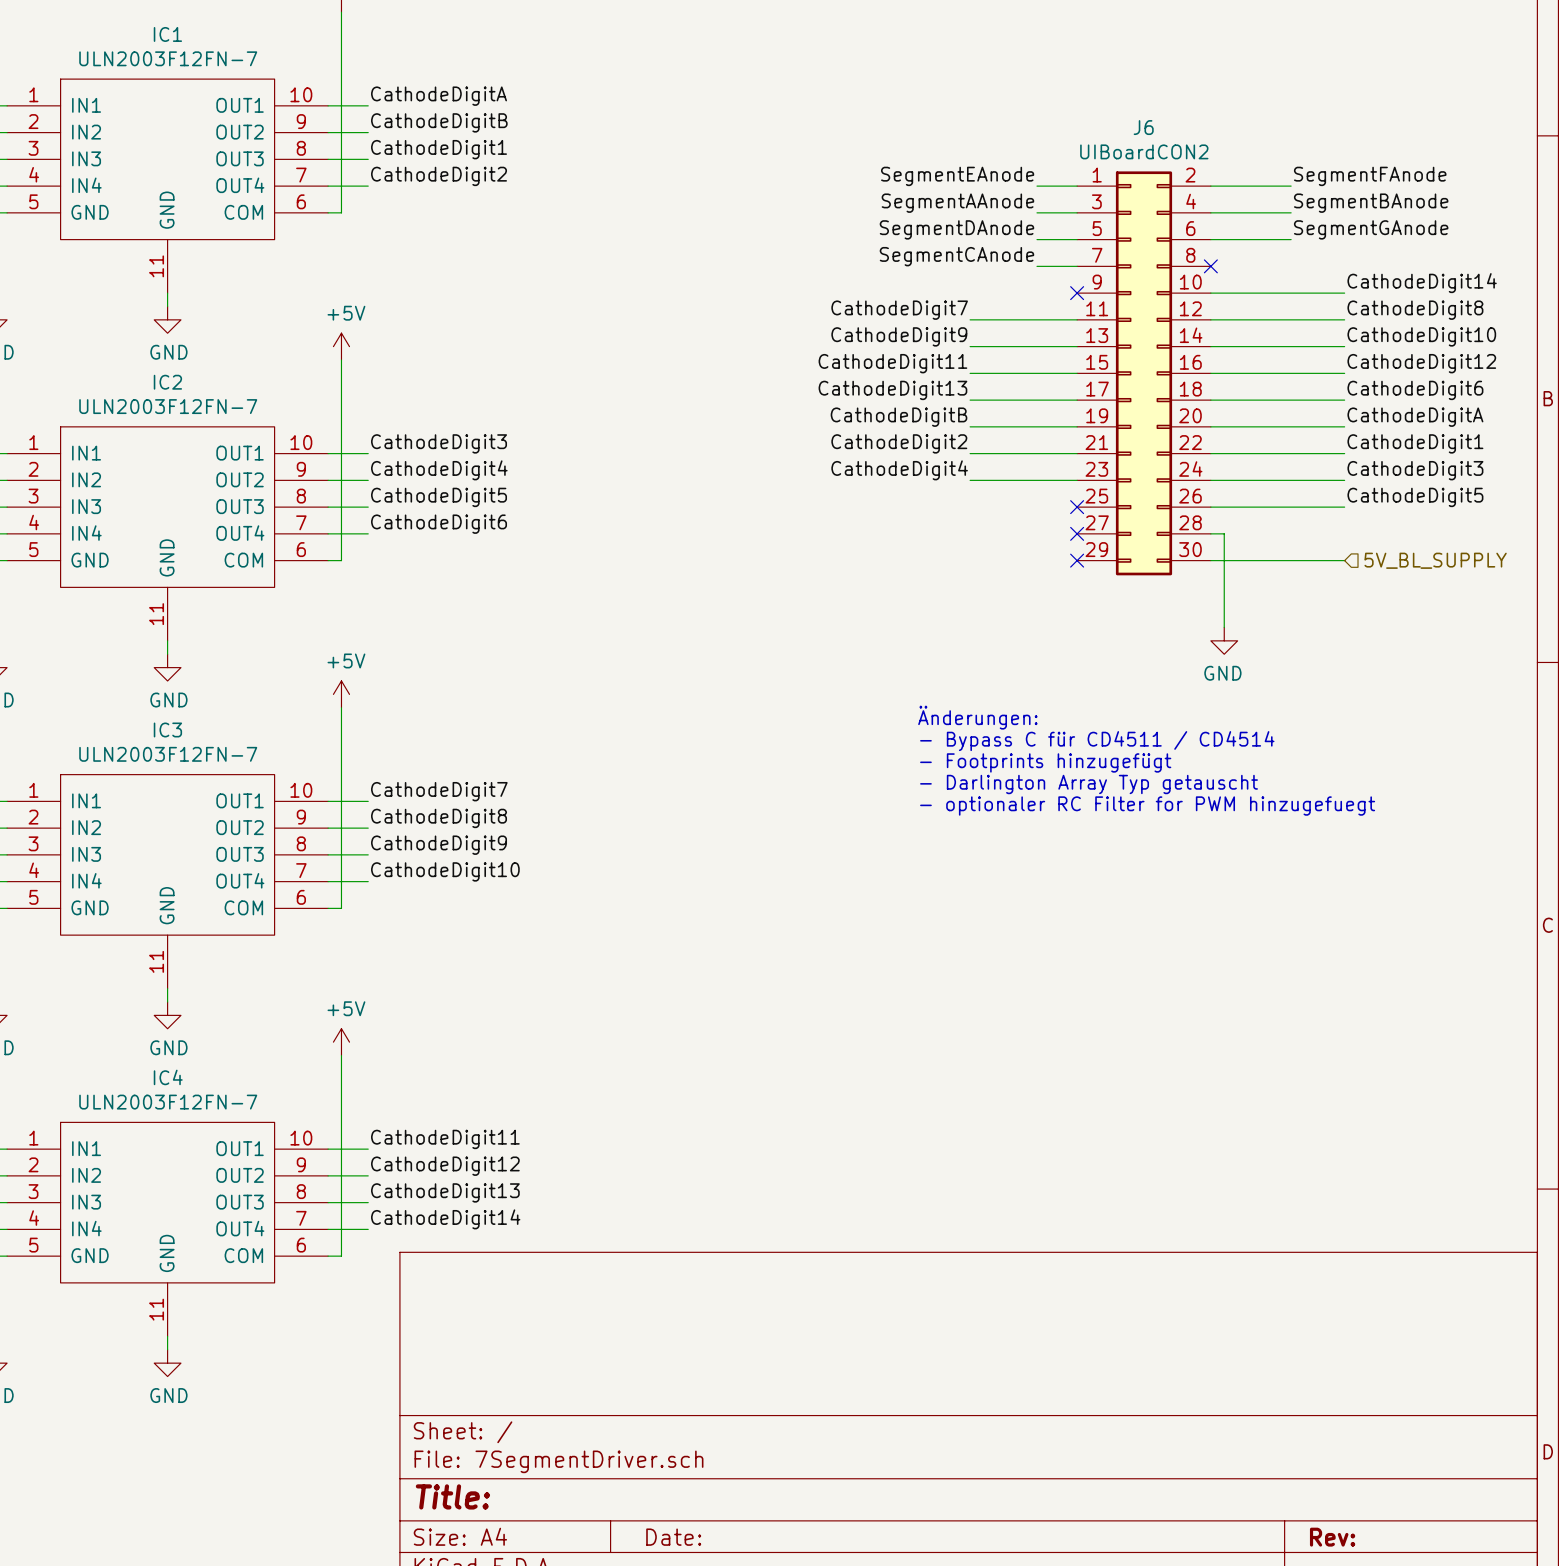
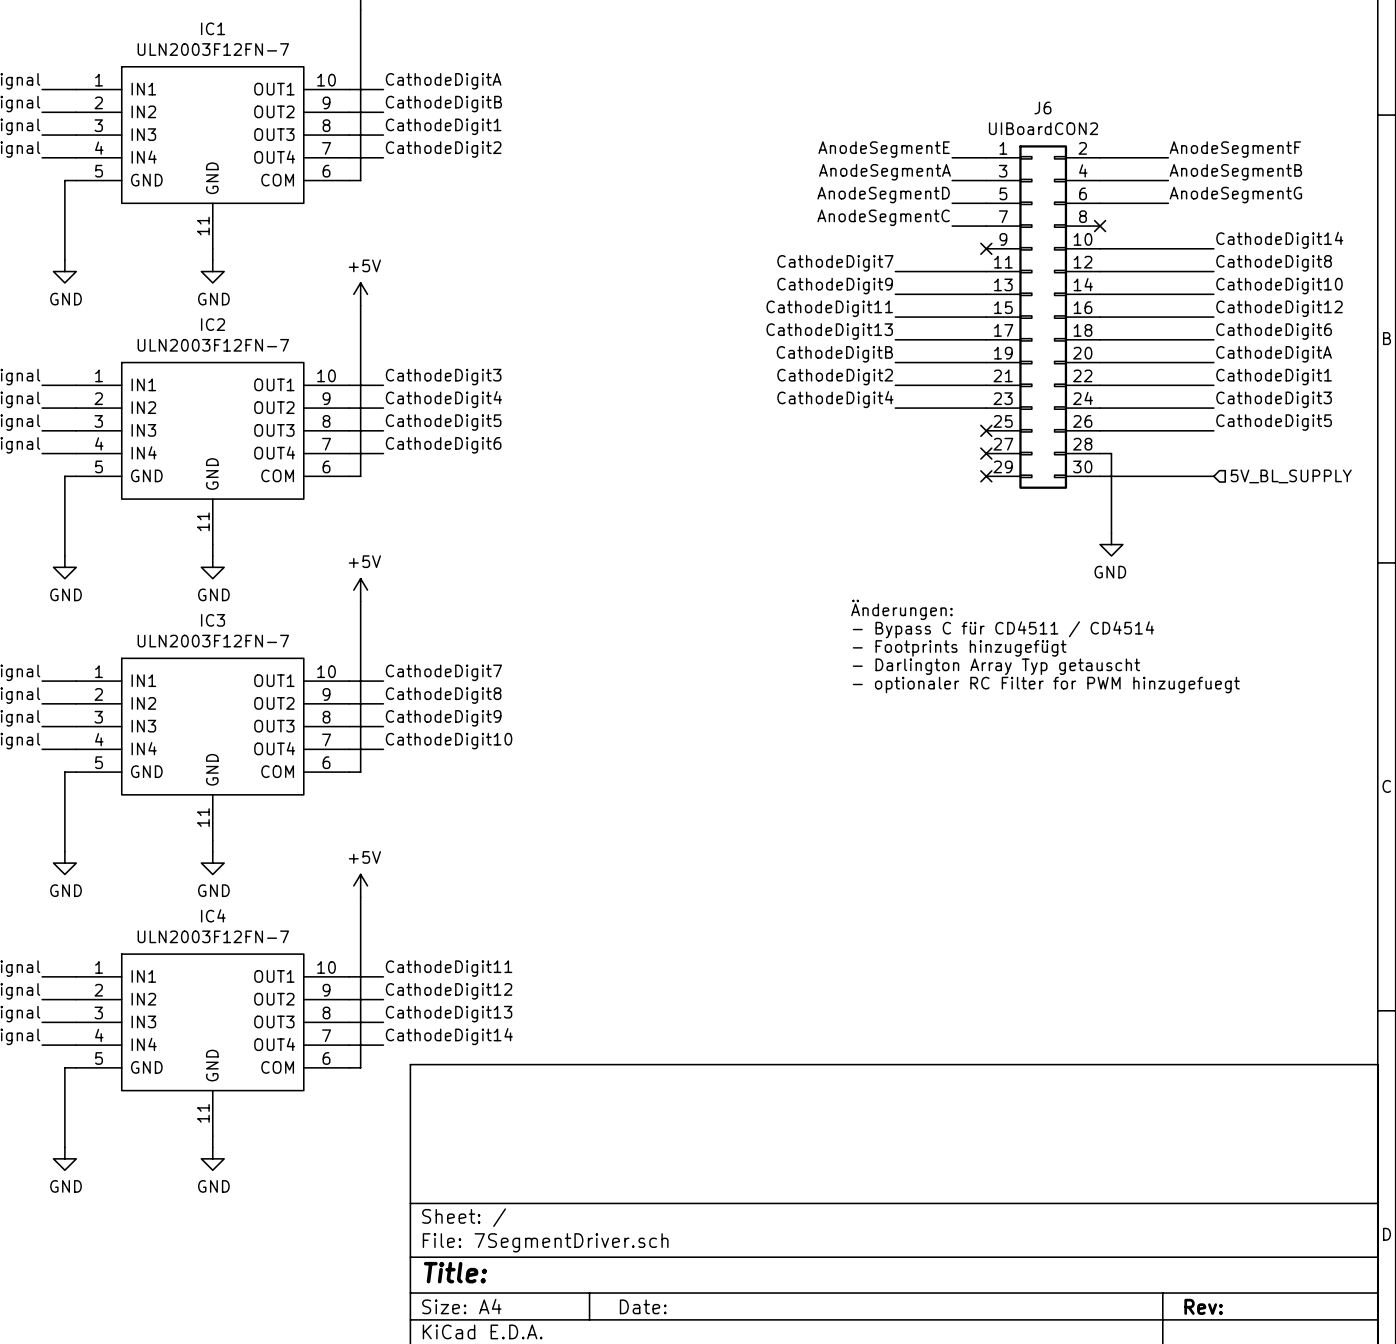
label: SegmentEAnode (957, 176) -> AnodeSegmentE (884, 149)
label: SegmentFAnode (1370, 176) -> AnodeSegmentF (1235, 149)
label: SegmentAAnode (957, 203) -> AnodeSegmentA (884, 172)
label: SegmentBAnode (1371, 203) -> AnodeSegmentB (1235, 172)
label: SegmentDAnode (956, 229) -> AnodeSegmentD (883, 195)
label: SegmentGAnode (1371, 229) -> AnodeSegmentG (1235, 195)
label: SegmentCAnode (956, 256) -> AnodeSegmentC (883, 217)

